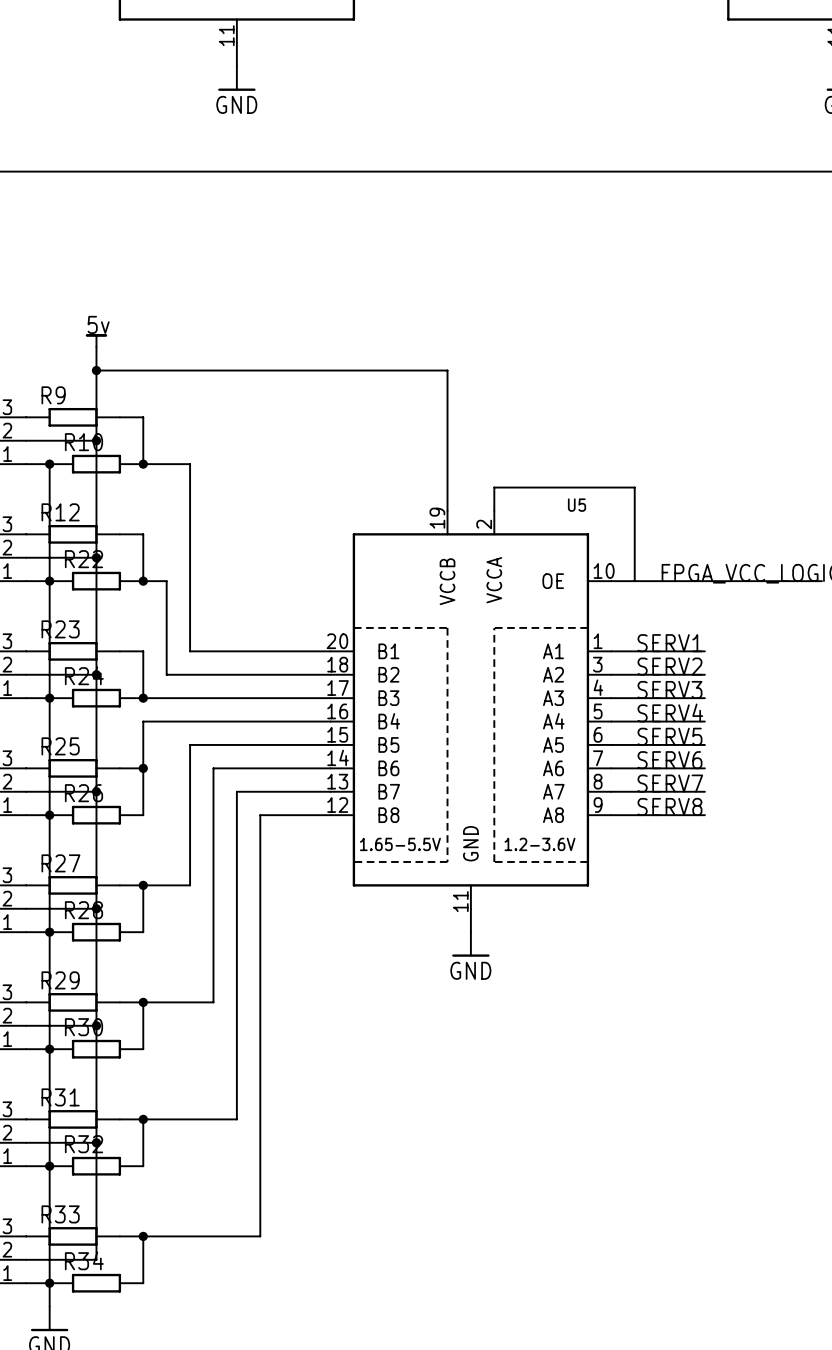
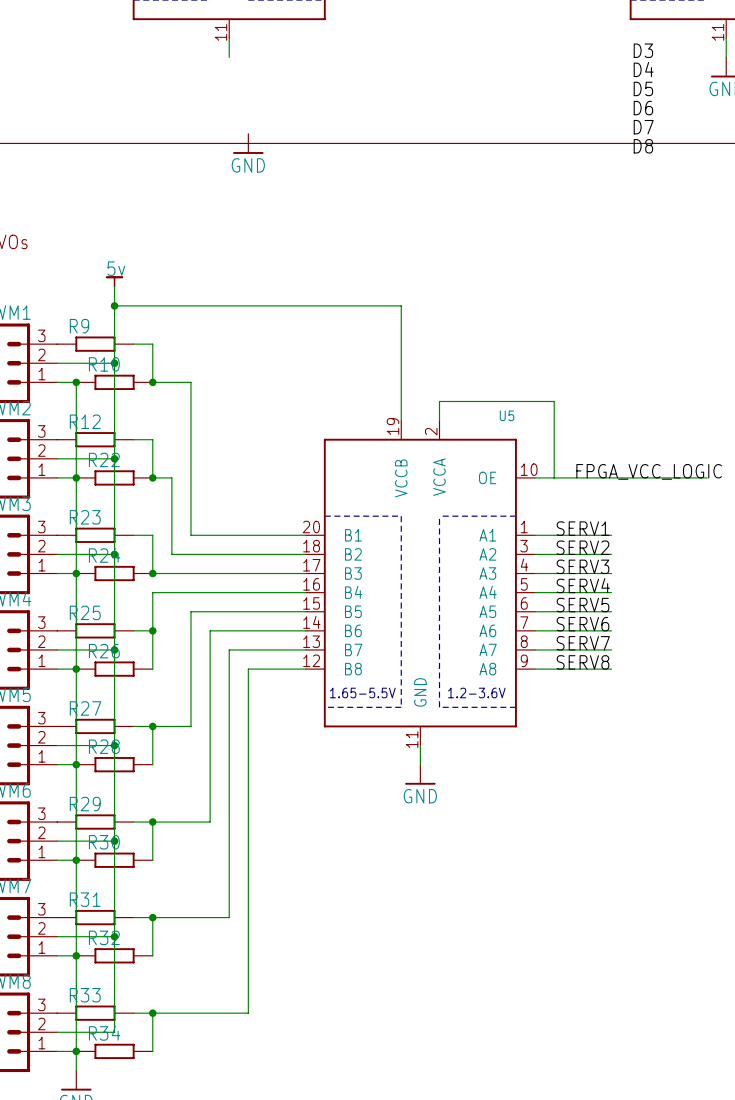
label: none -> D3 (643, 50)
power symbol position: GND (236, 78) -> GND (248, 143)
label: none -> D4 (643, 69)
label: none -> D5 (643, 88)
label: none -> D6 (643, 108)
label: none -> D7 (643, 127)
label: none -> D8 (643, 146)

